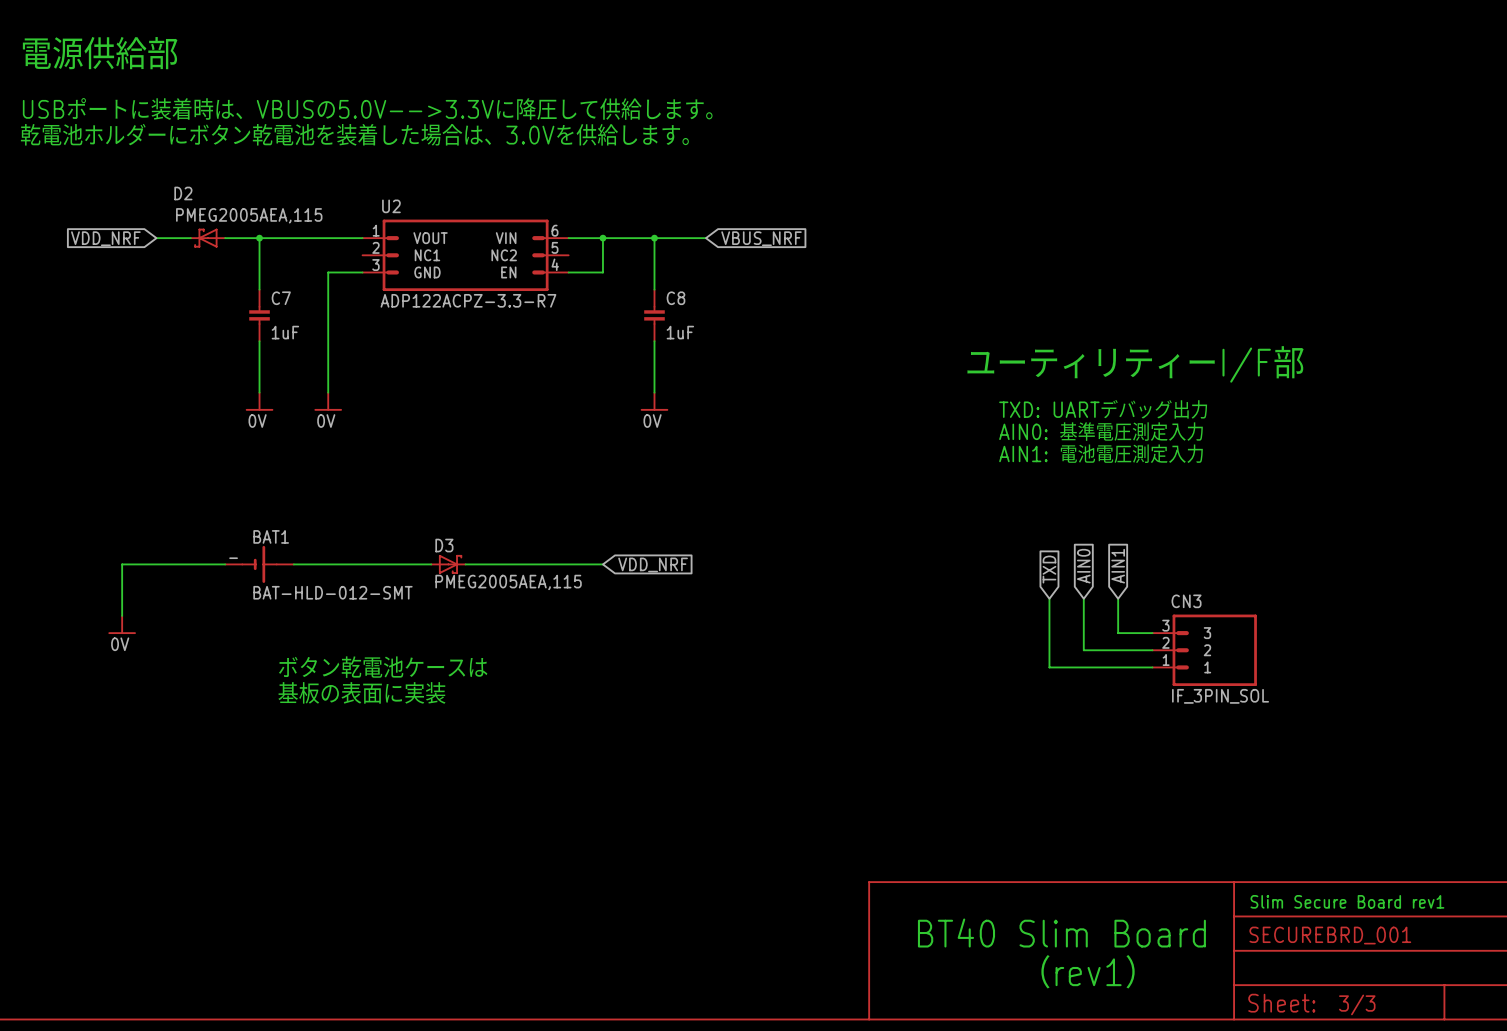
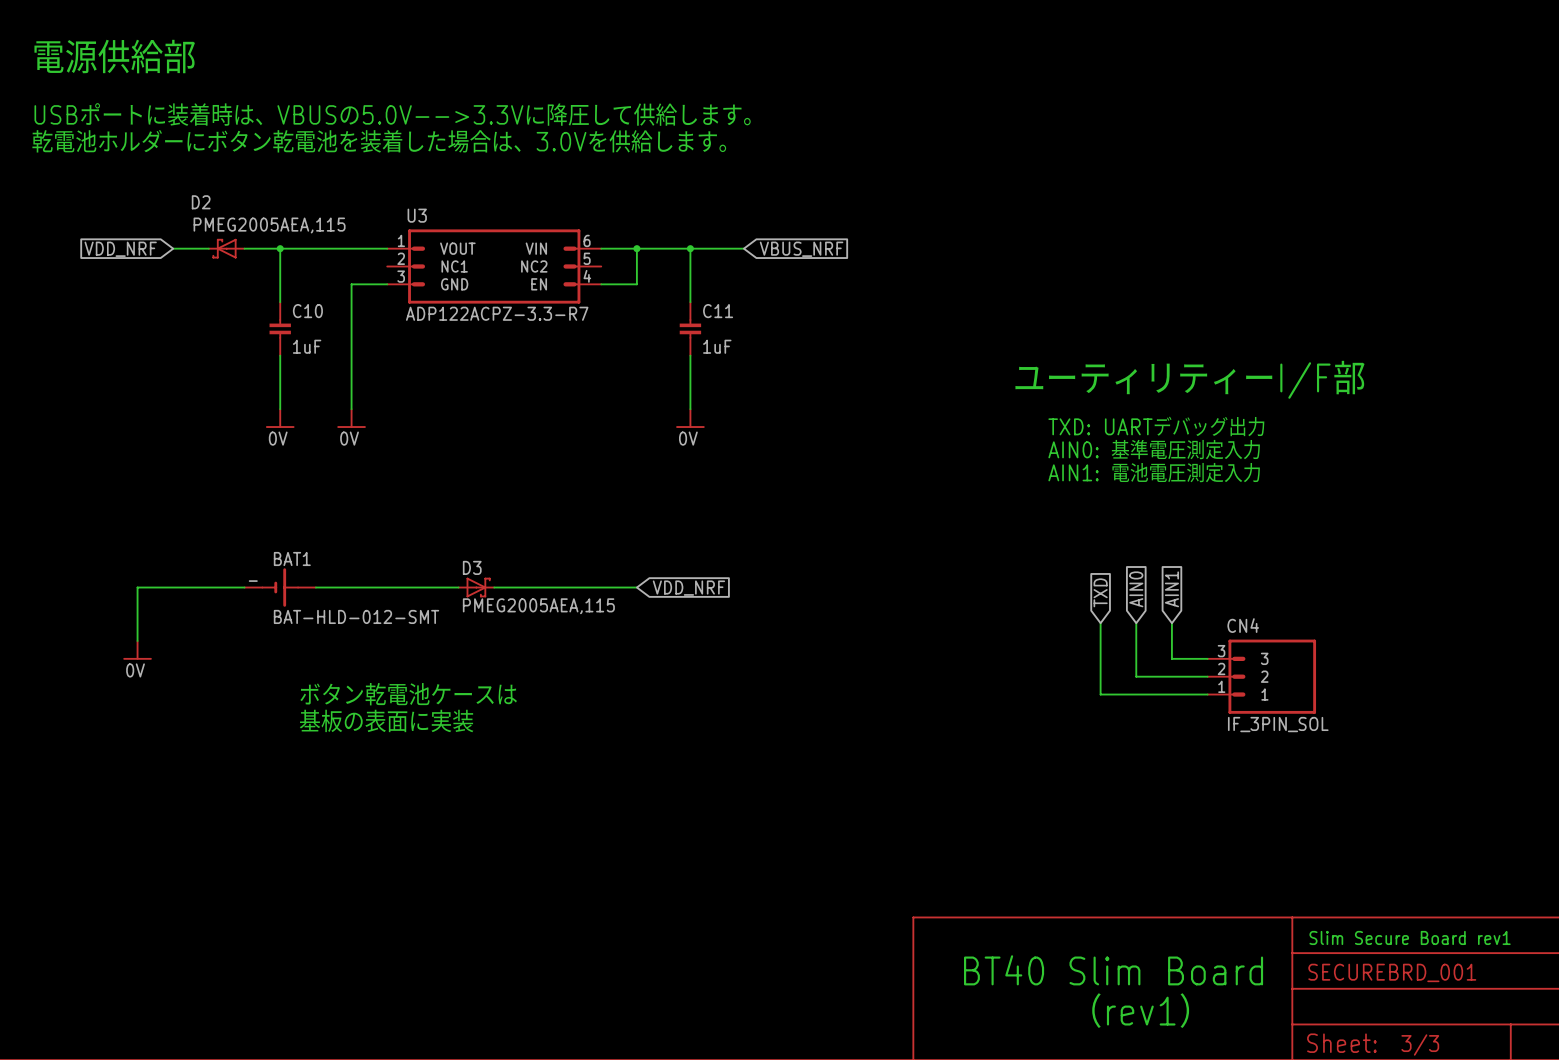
U2 name: U2 (391, 206) -> U3 (417, 215)
C7 name: C7 (281, 298) -> C10 (307, 311)
C8 name: C8 (675, 298) -> C11 (718, 311)
CN3 name: CN3 (1186, 601) -> CN4 (1243, 625)

